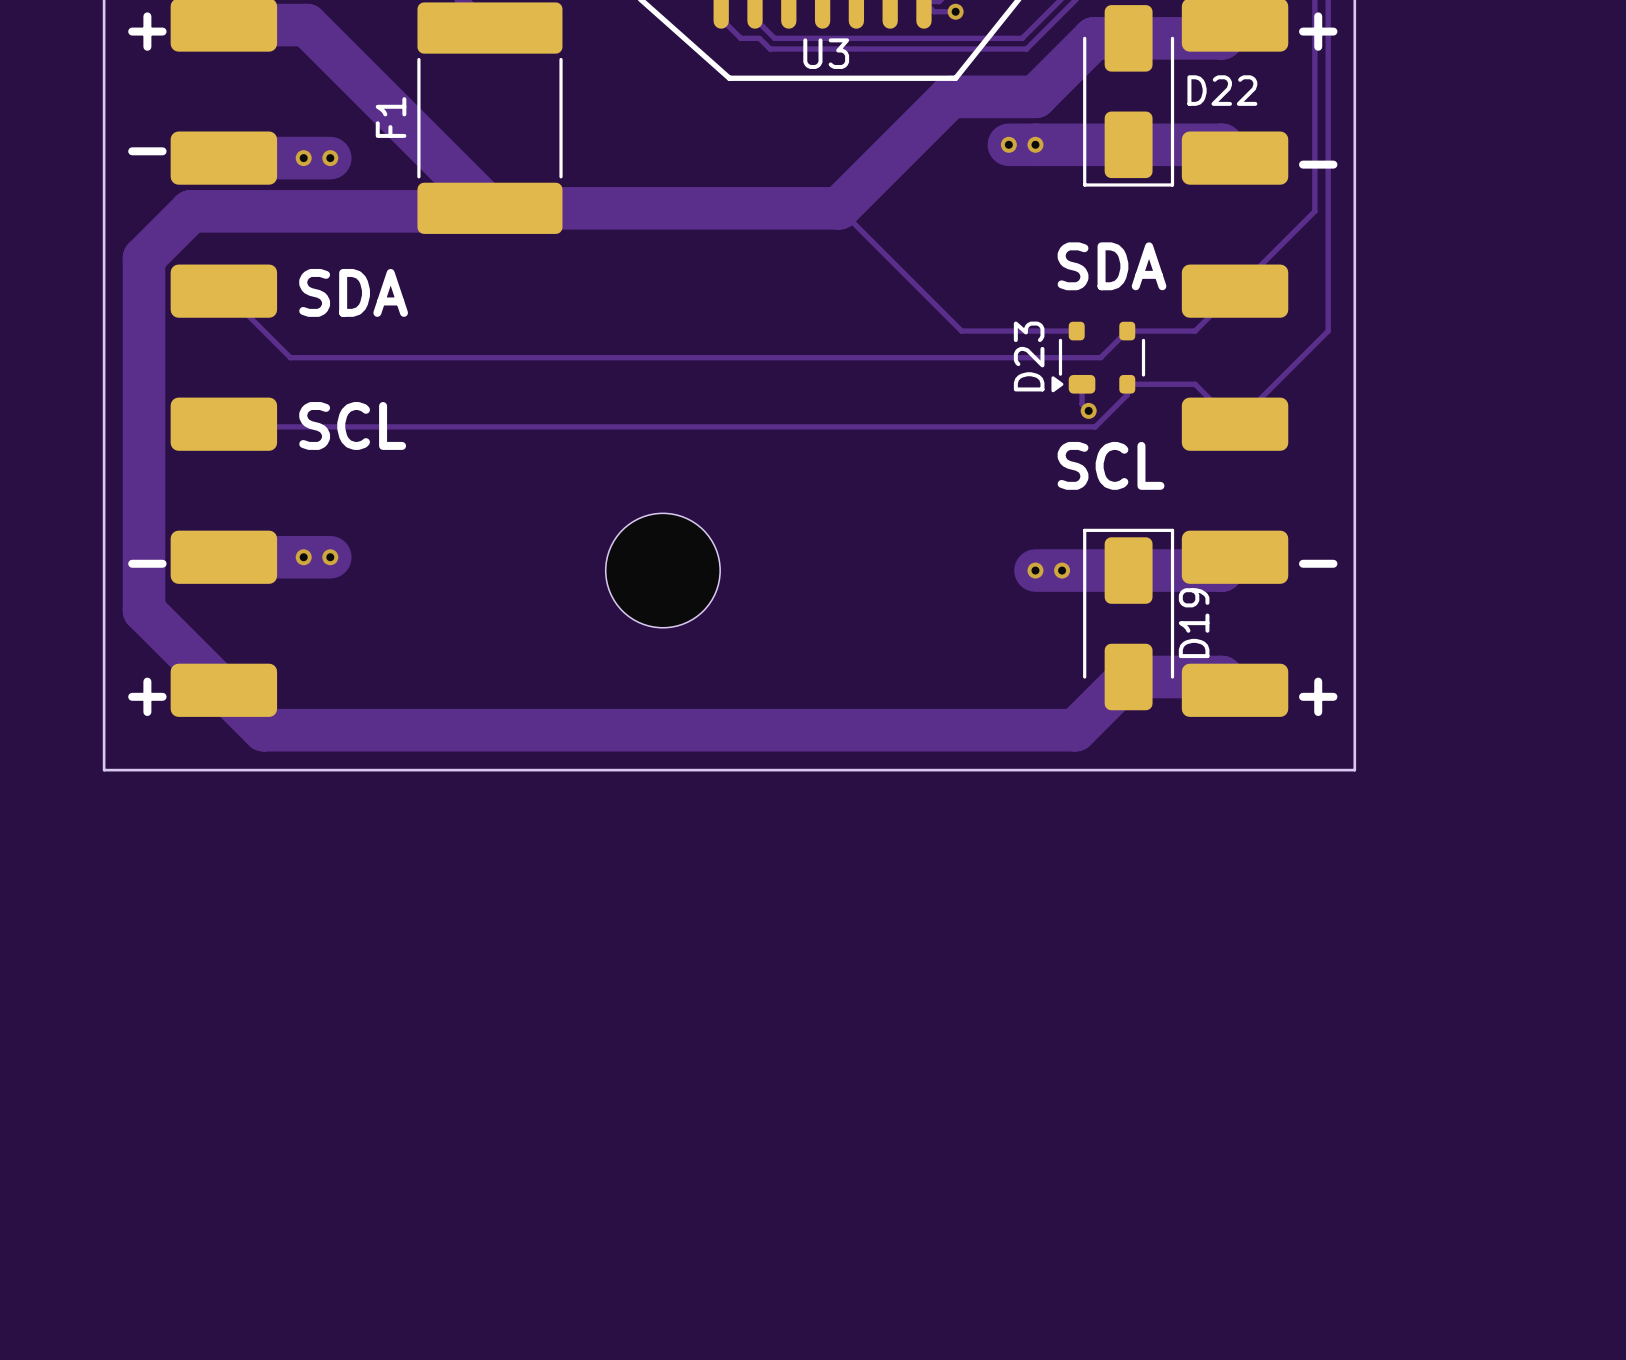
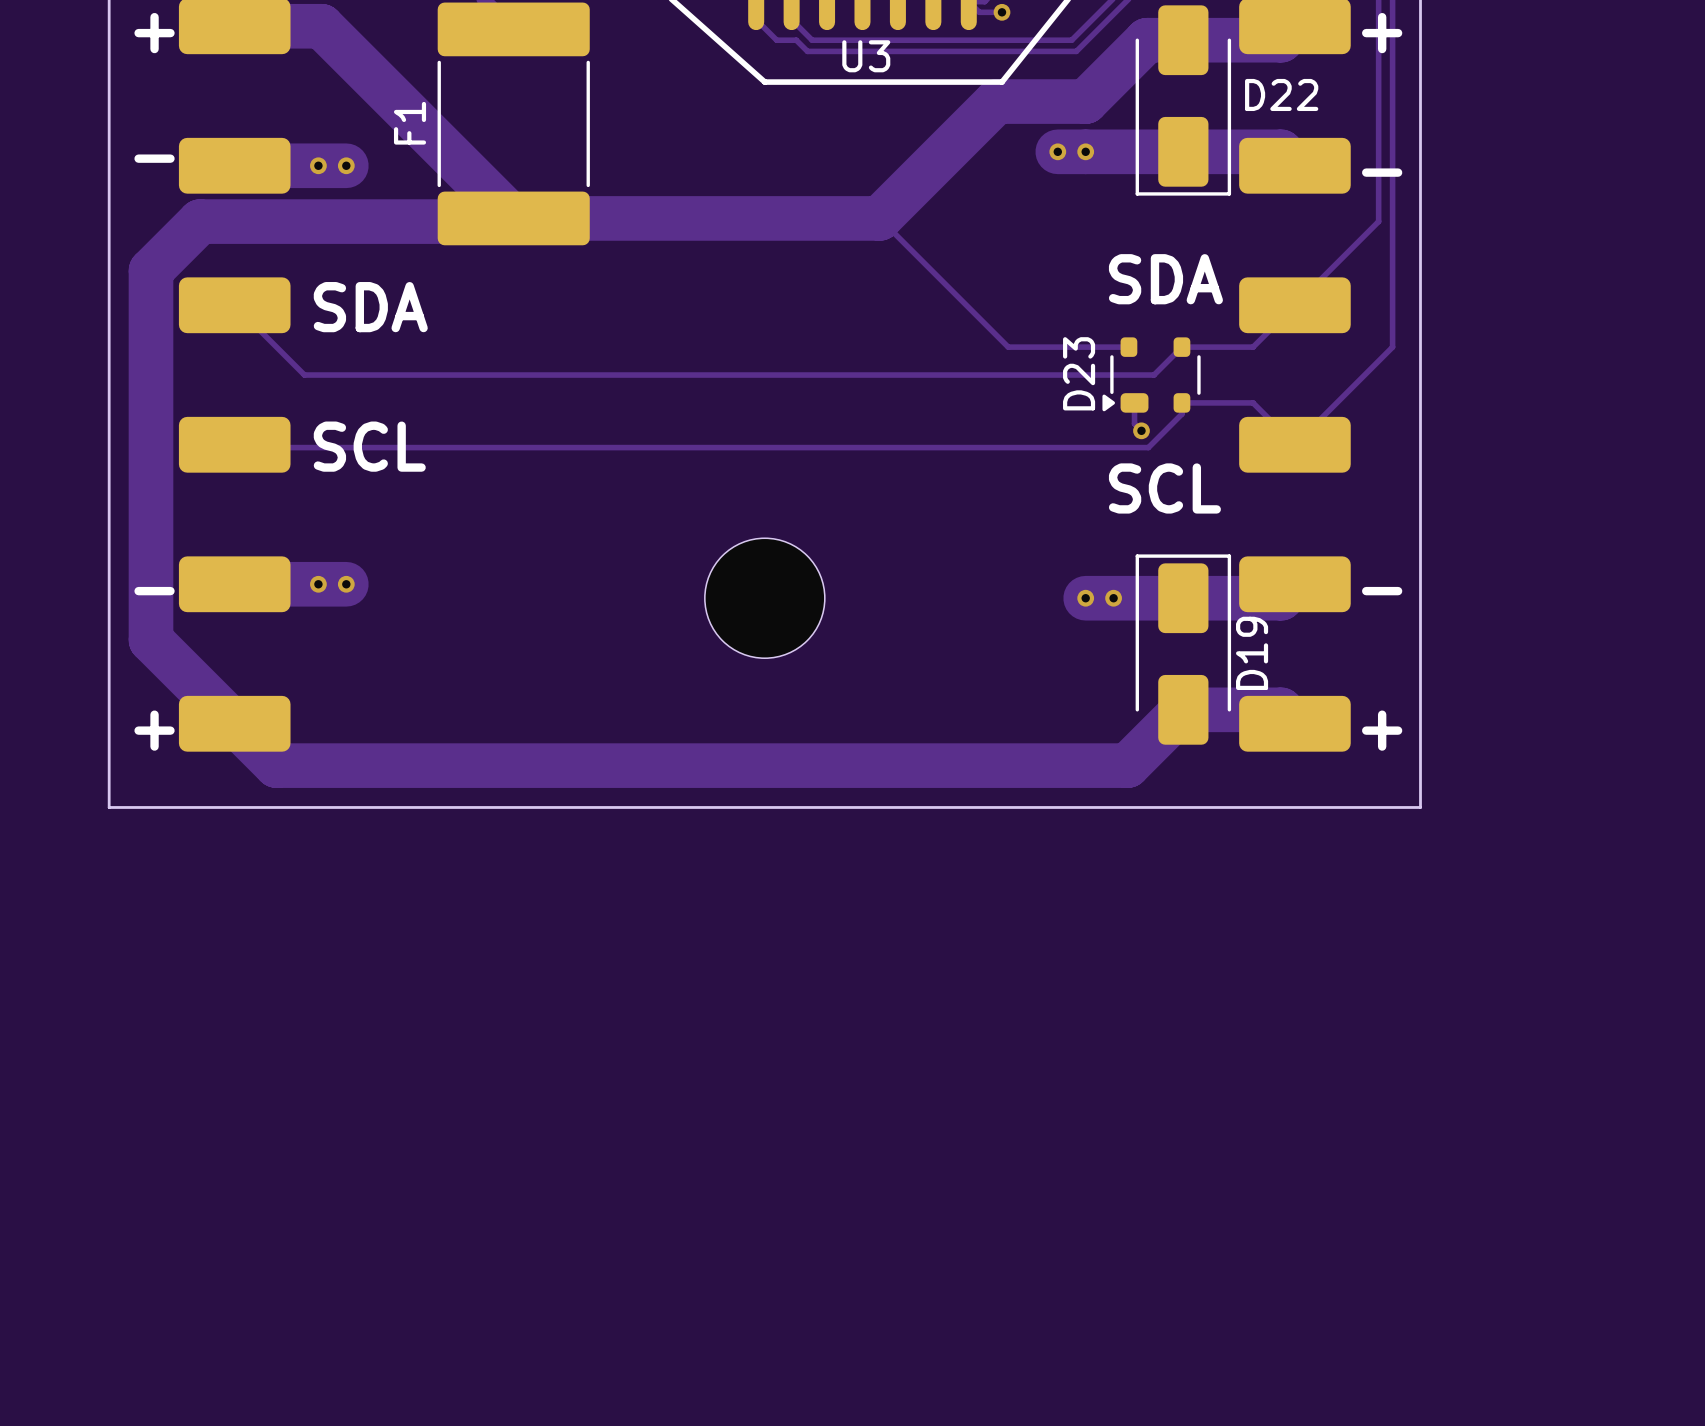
part position: (662, 570) -> (764, 598)

